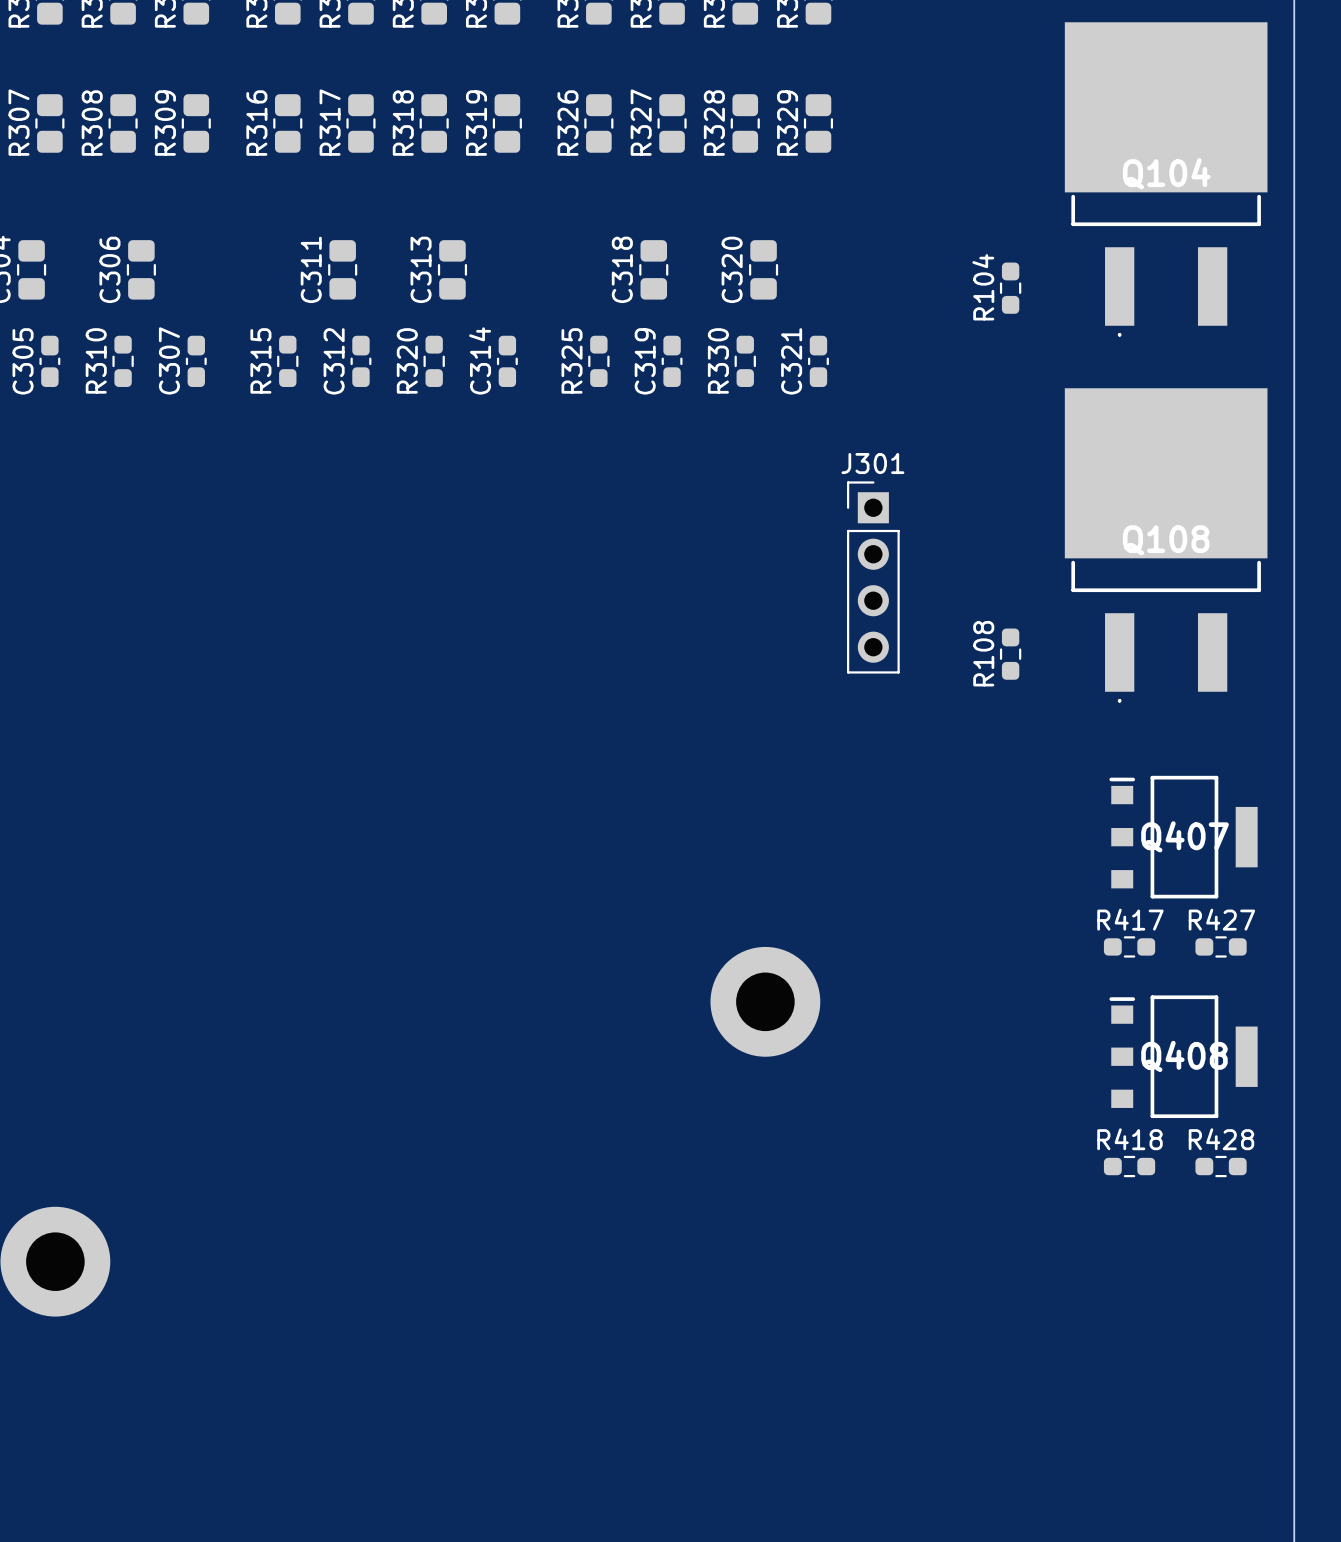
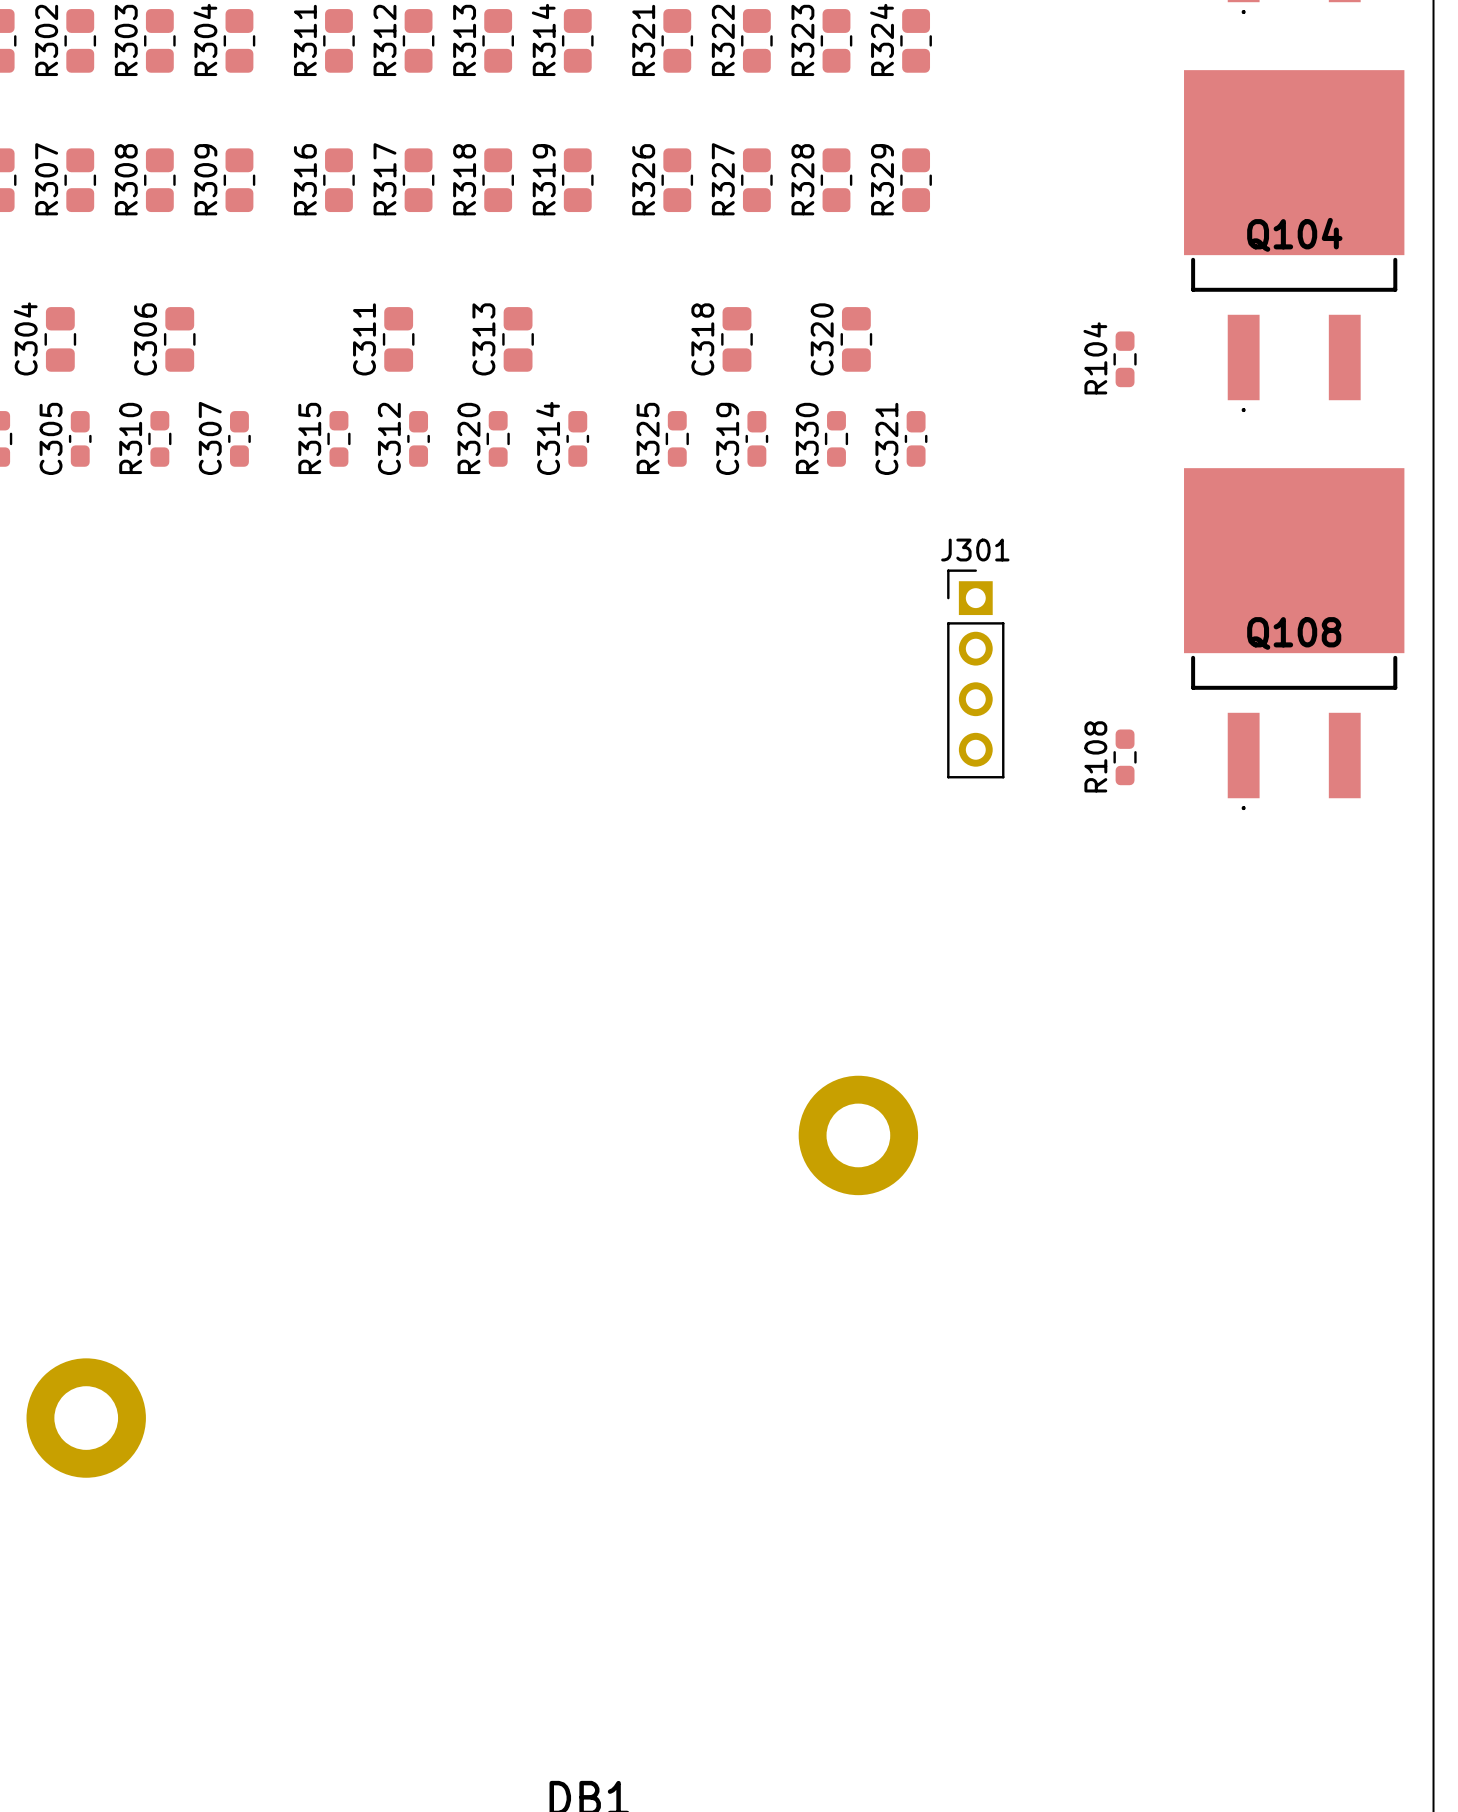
Q407: (1183, 837) -> none
R417: (1129, 946) -> none
R427: (1221, 946) -> none
Q408: (1183, 1056) -> none
R418: (1129, 1166) -> none
R428: (1221, 1166) -> none

